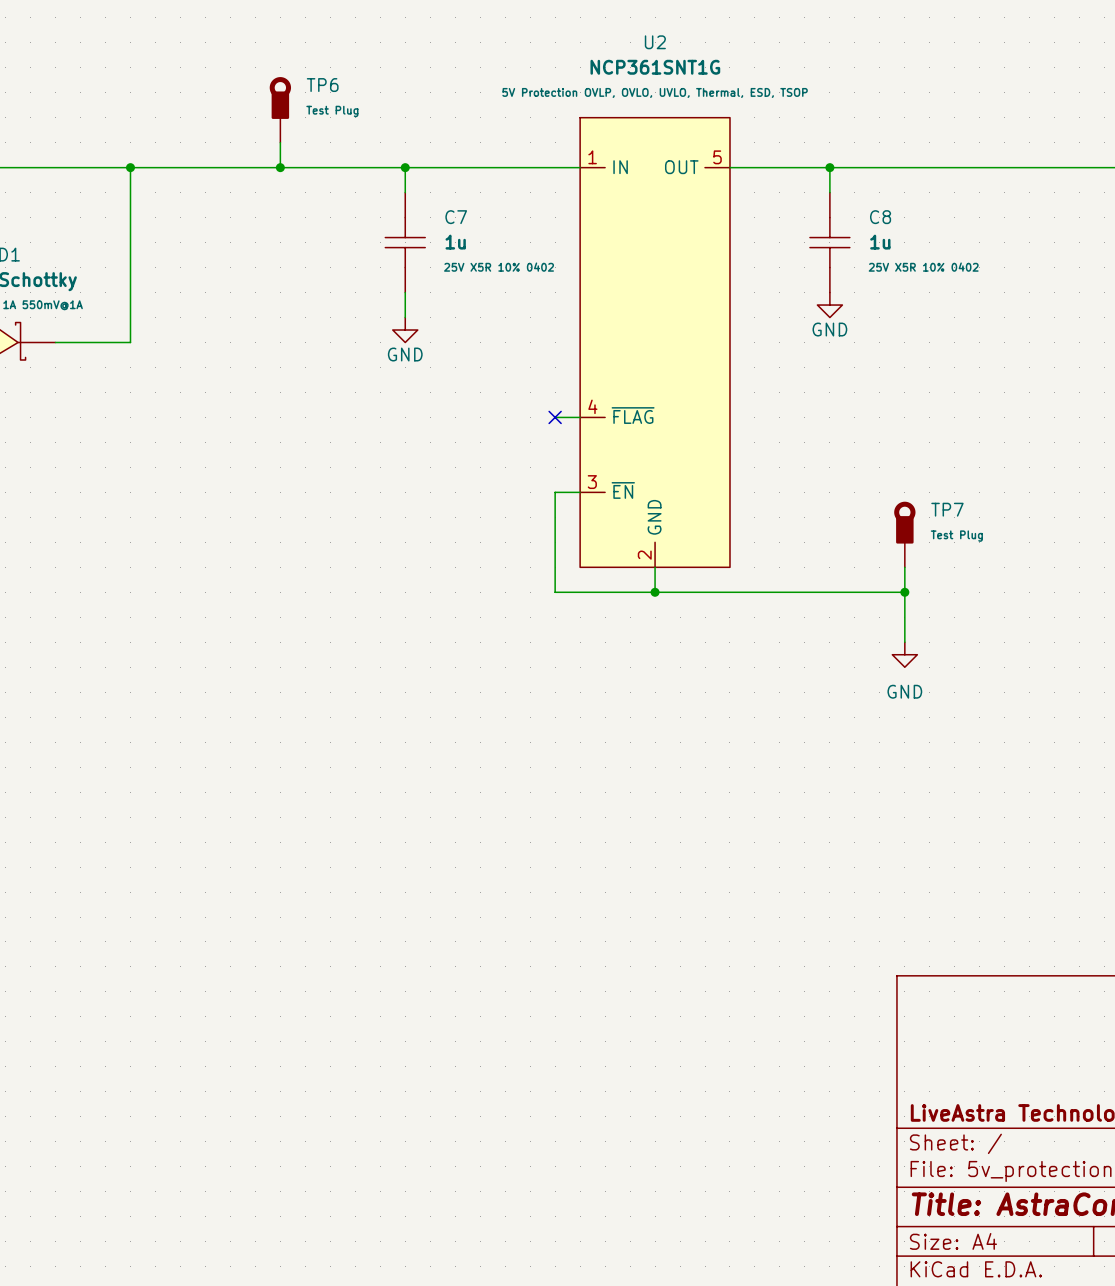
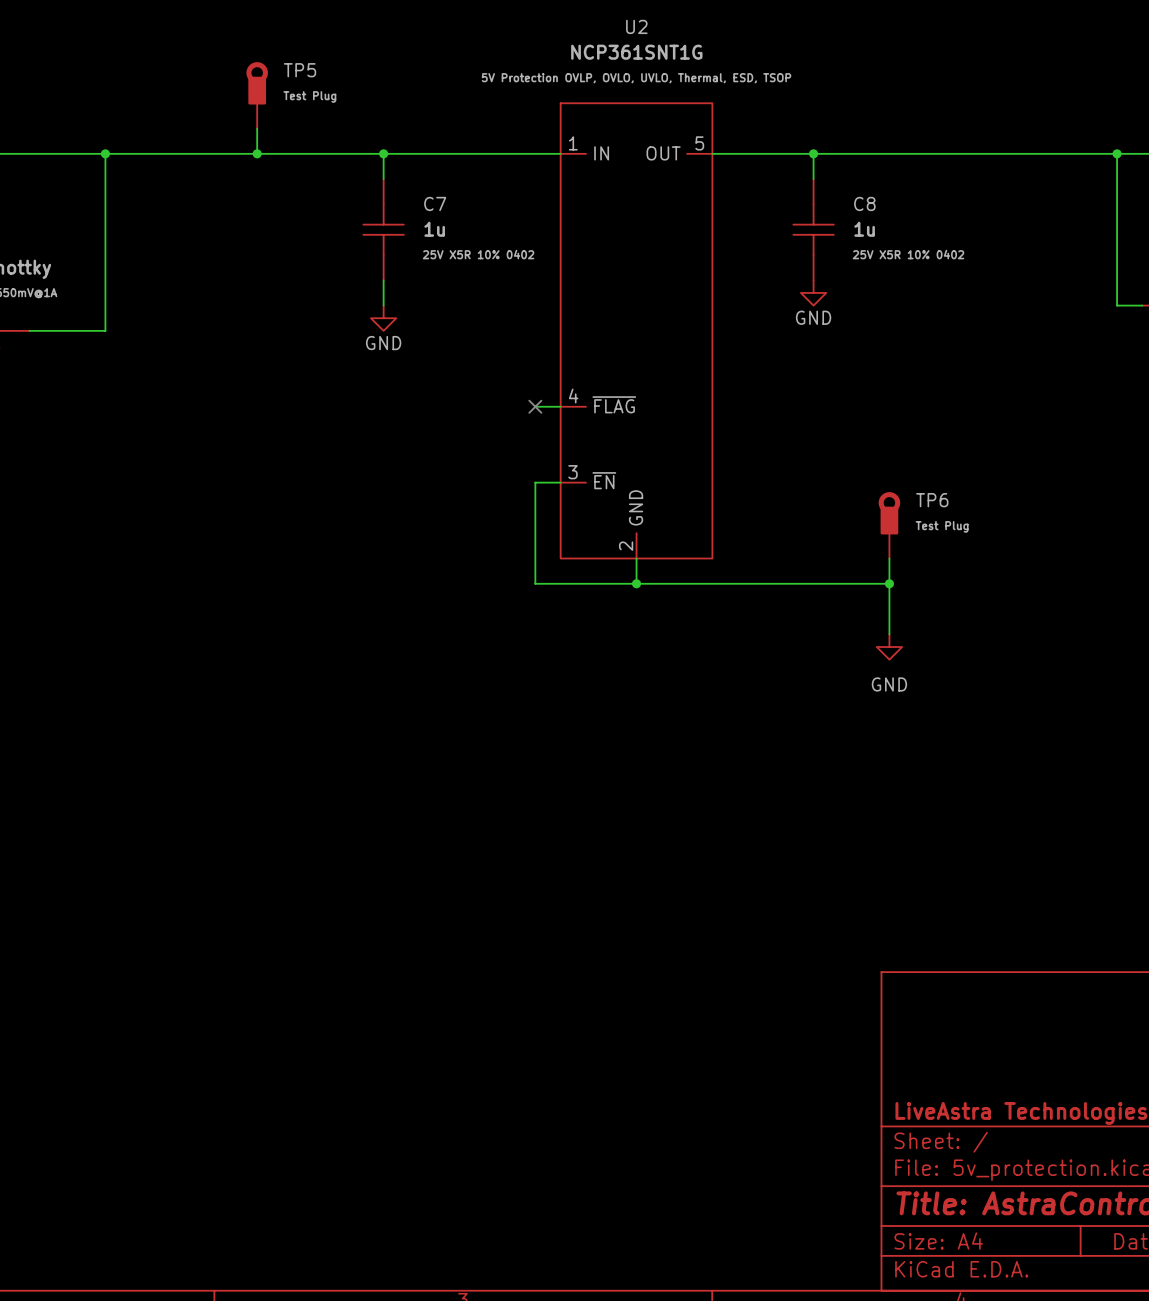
TP6 name: TP6 (322, 85) -> TP5 (300, 70)
TP7 name: TP7 (947, 509) -> TP6 (932, 500)

